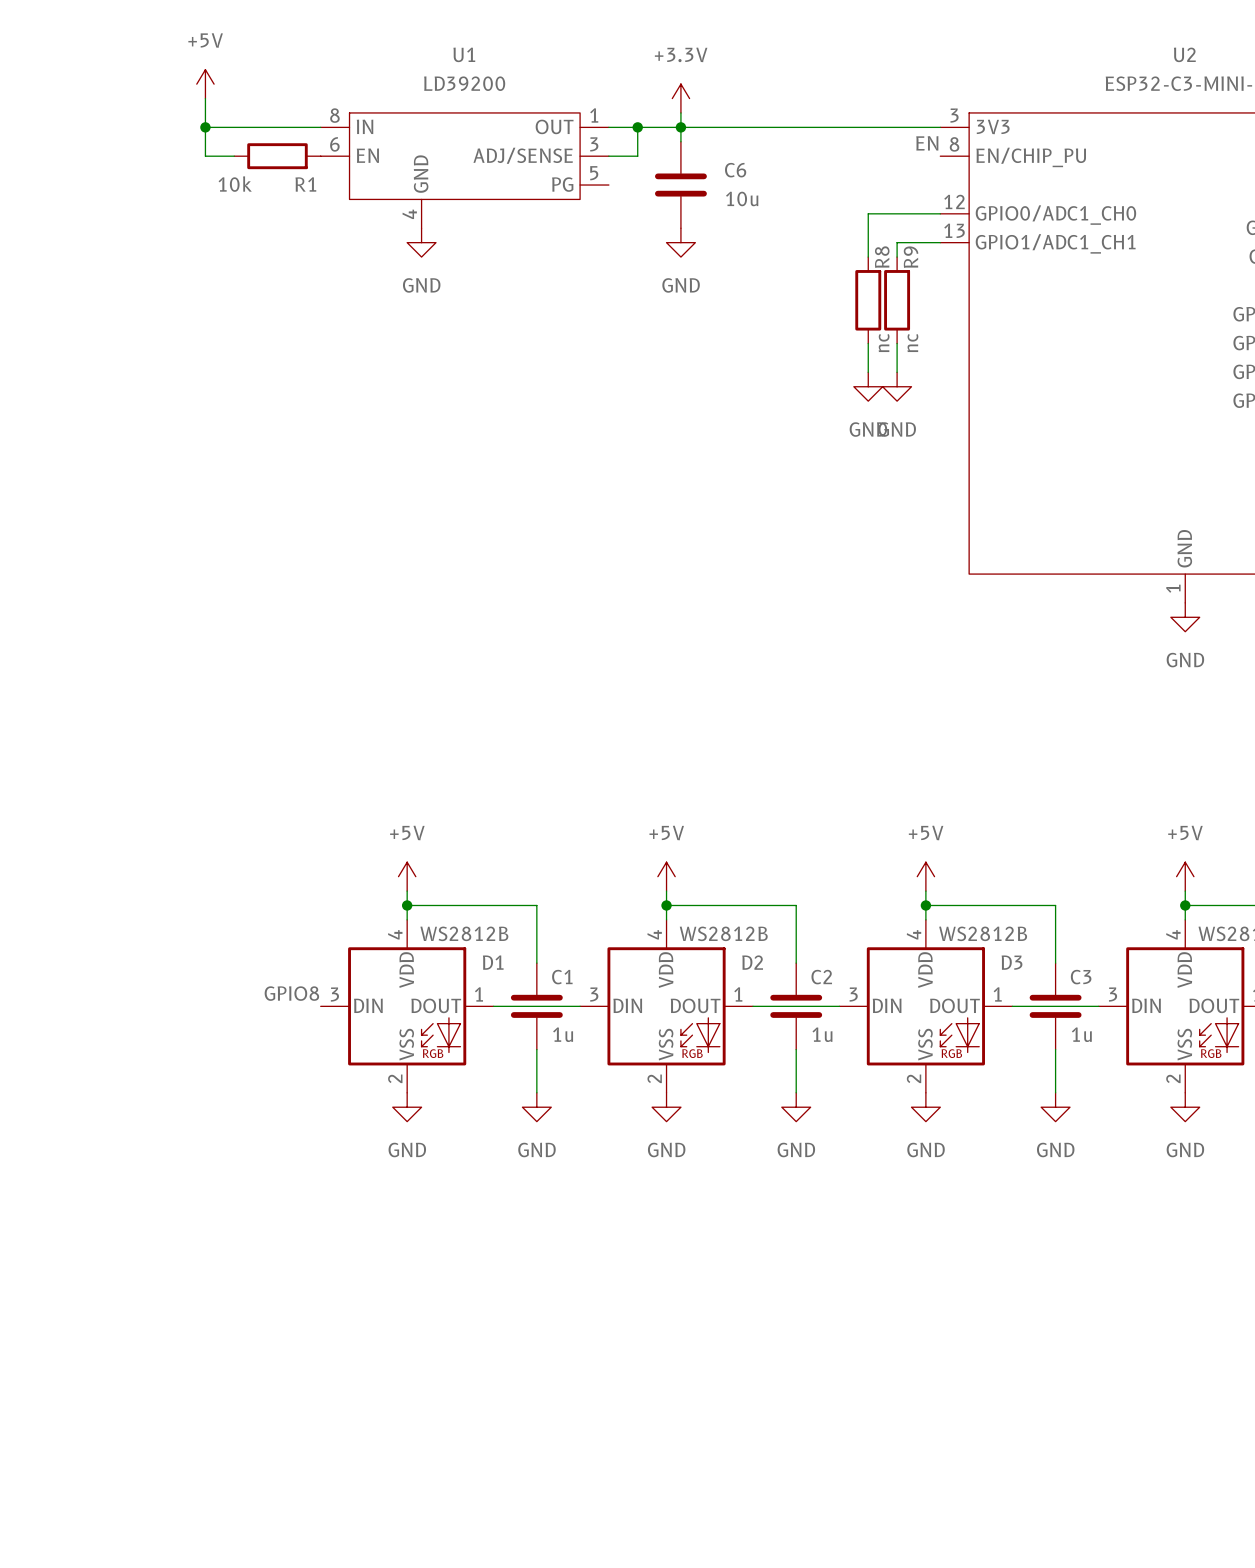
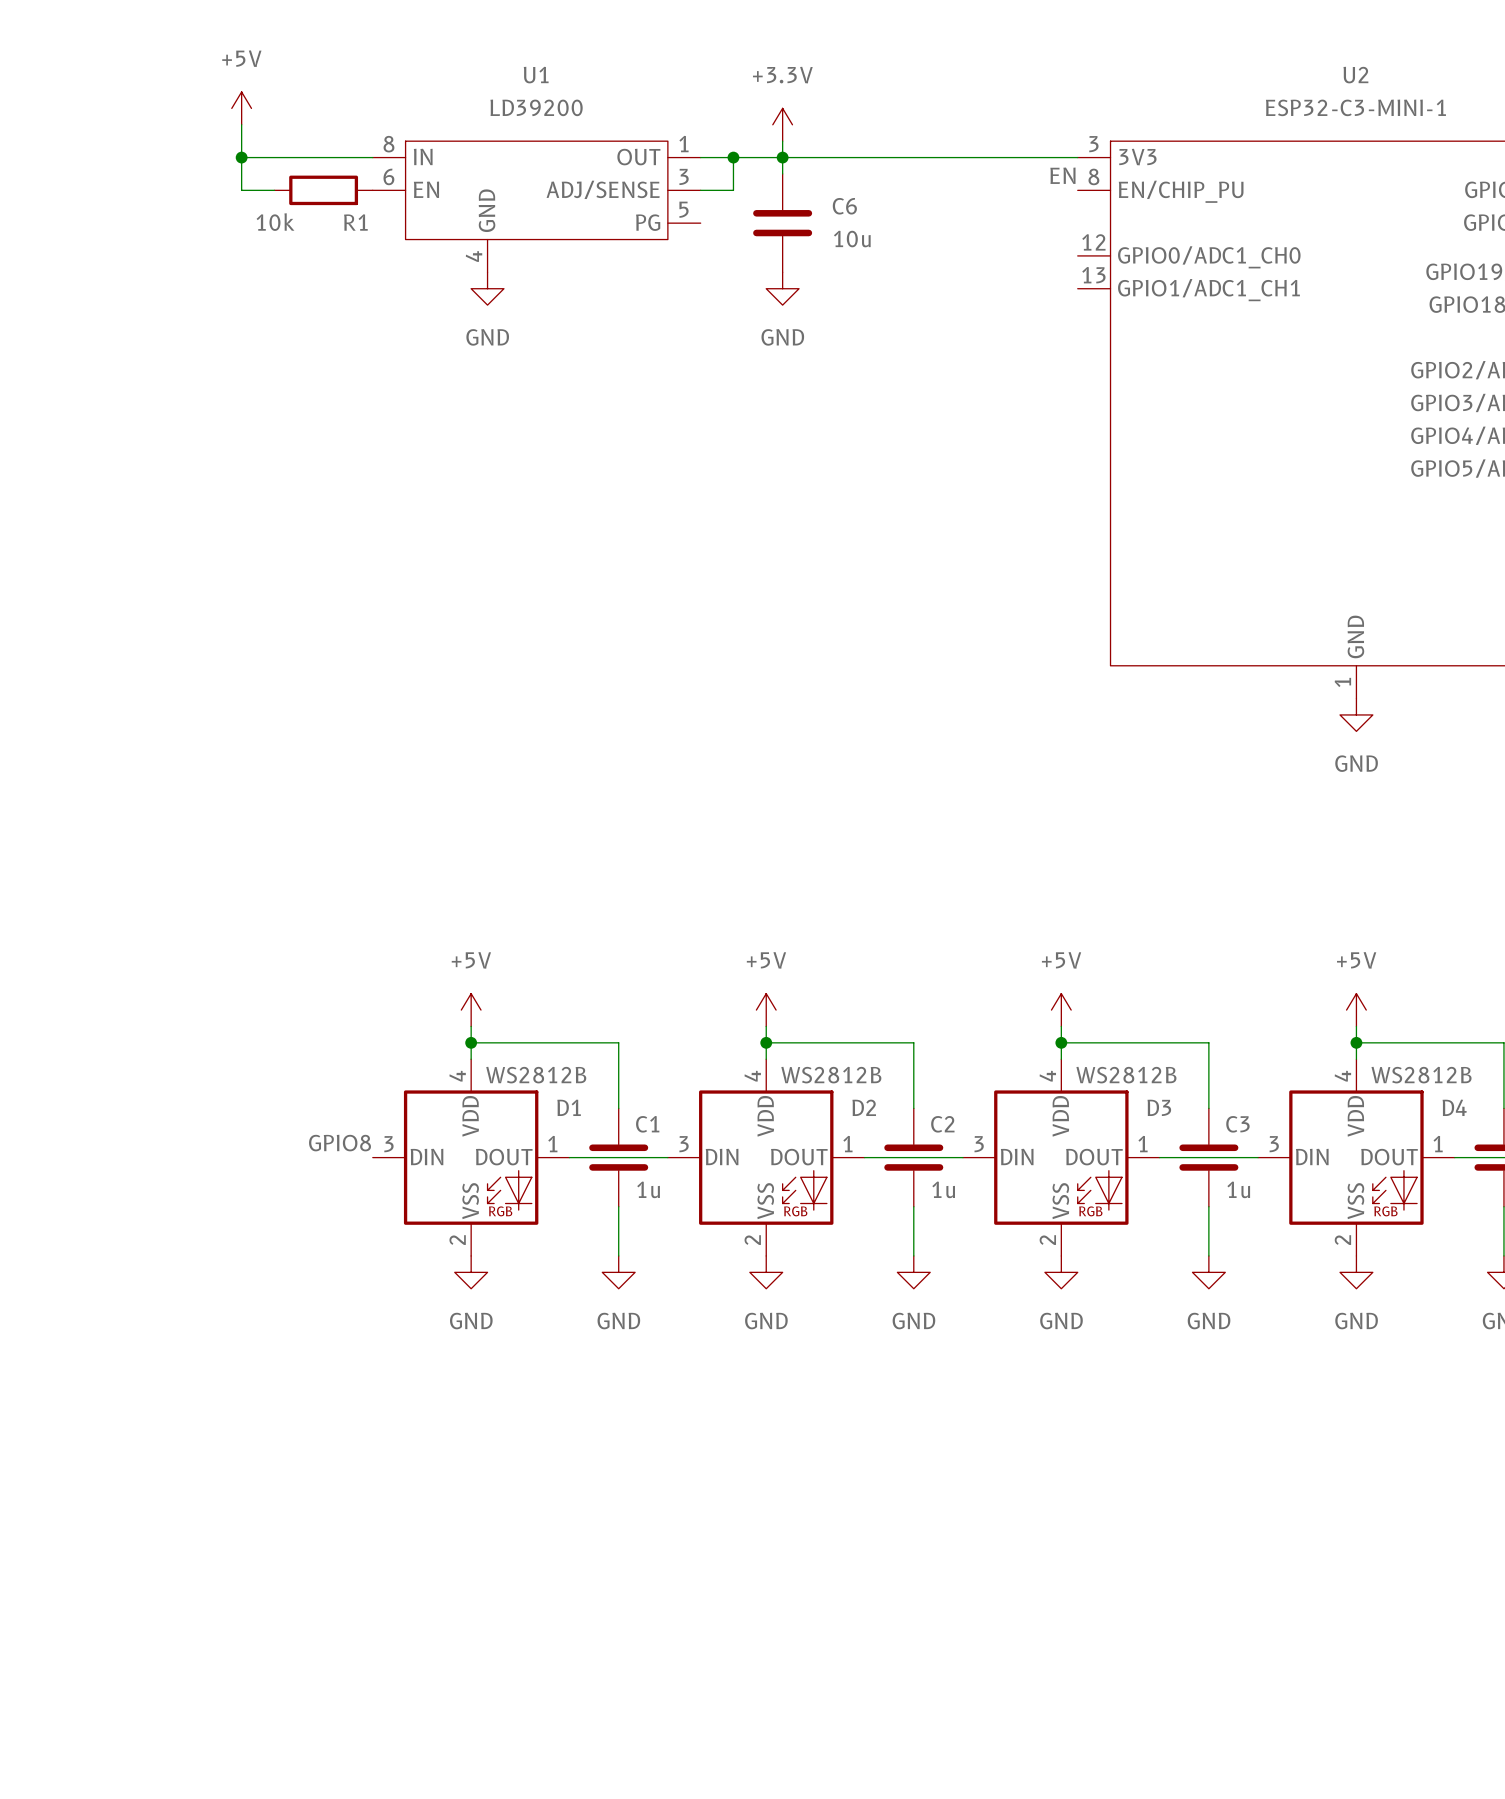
wire: (940, 213) (868, 213) (868, 257) -> none
wire: (940, 242) (897, 242) (897, 257) -> none
R8: nc (868, 300) -> none
R9: nc (897, 300) -> none
wire: (868, 343) (868, 372) -> none
wire: (897, 343) (897, 372) -> none
power symbol: GND (868, 386) -> none
power symbol: GND (897, 386) -> none

